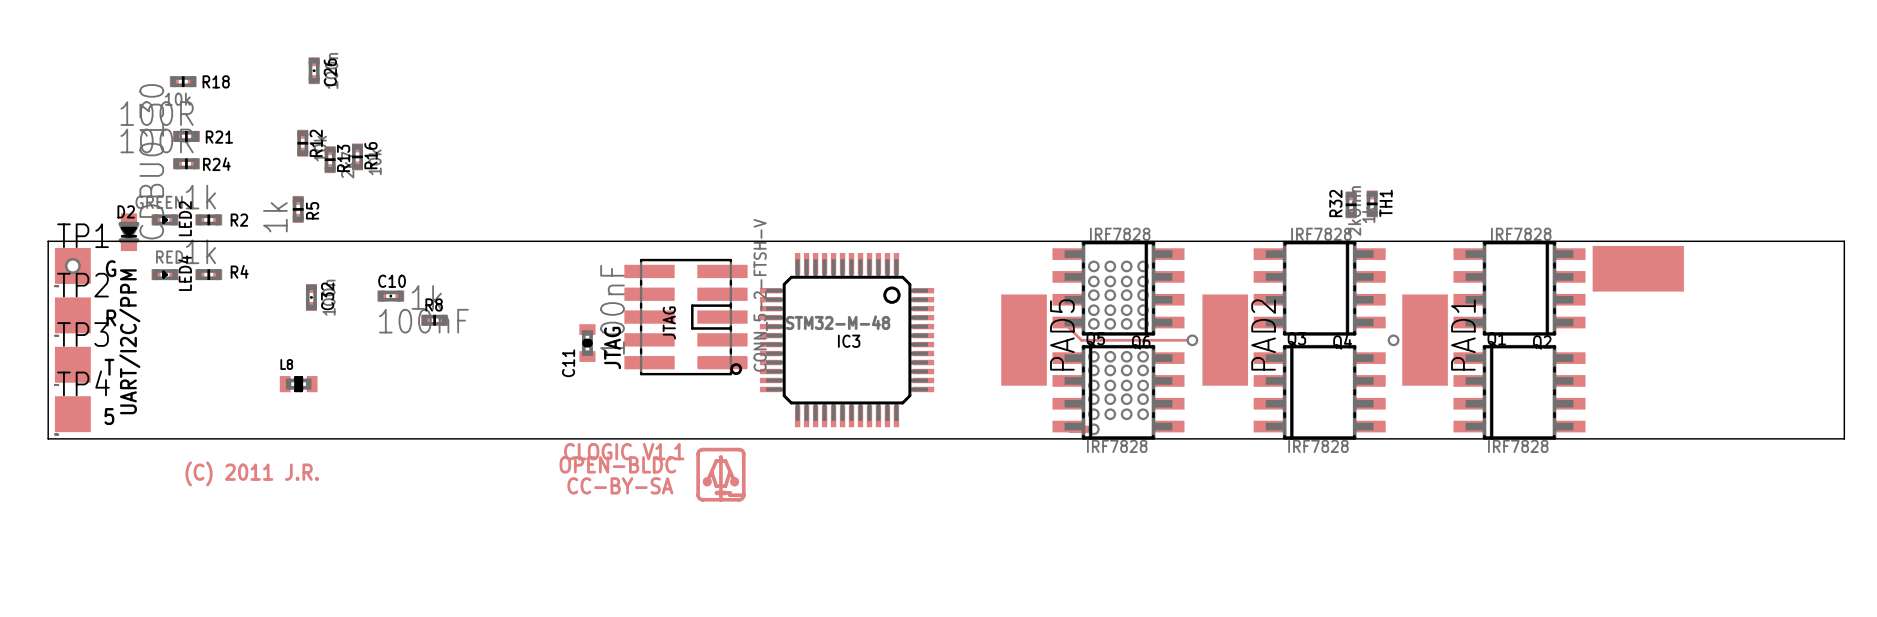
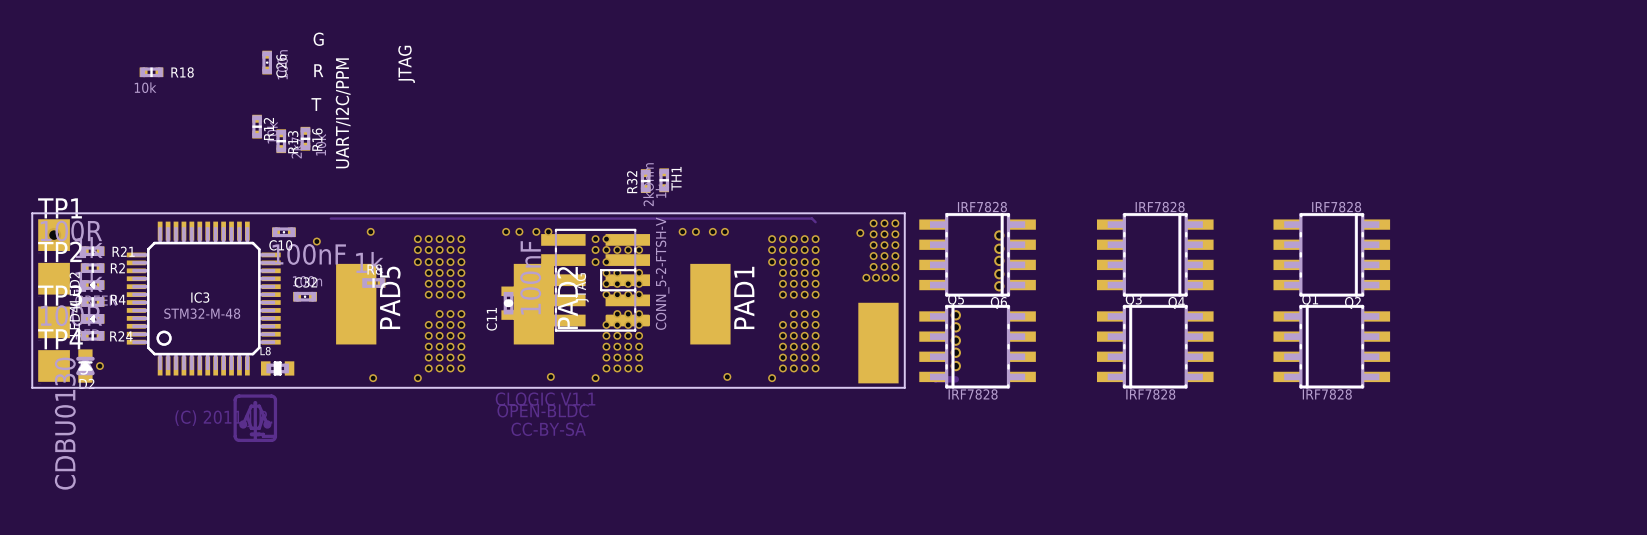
R21 position: (186, 136) -> (92, 251)
R24 position: (186, 163) -> (92, 335)
TH1 position: (1372, 203) -> (664, 180)
R32 position: (1351, 204) -> (645, 181)
R5: 1k (298, 209) -> none
LED2 rotation: 0° (164, 219) -> 180° (92, 285)
LED2 position: (164, 219) -> (92, 285)
R2 position: (208, 219) -> (92, 268)
D2 rotation: 0° (128, 232) -> 180° (85, 366)
D2 position: (128, 232) -> (85, 366)
board edge: (1036, 241) (1844, 241) (1844, 438) (1036, 438) -> (904, 213) (904, 387)
track: none -> (330, 218) (811, 218) (815, 222)
via: none -> (873, 223)
via: none -> (884, 223)
via: none -> (895, 223)
via: none -> (370, 231)
via: none -> (506, 231)
via: none -> (519, 231)
via: none -> (536, 231)
via: none -> (548, 231)
via: none -> (682, 231)
via: none -> (695, 231)
via: none -> (712, 231)
via: none -> (724, 231)
via: none -> (860, 233)
via: none -> (873, 234)
via: none -> (884, 234)
via: none -> (895, 234)
via: (1093, 266) -> none
via: (1110, 266) -> none
via: (1126, 266) -> none
text position: G (111, 268) -> G (318, 39)
part: (1638, 268) -> none
via: none -> (417, 239)
via: none -> (428, 239)
via: none -> (439, 239)
via: none -> (450, 239)
via: none -> (461, 239)
via: none -> (595, 239)
via: none -> (606, 239)
via: none -> (772, 239)
via: none -> (782, 239)
via: none -> (793, 239)
via: none -> (804, 239)
via: none -> (815, 239)
via: none -> (316, 241)
LED4 rotation: 0° (164, 274) -> 180° (92, 318)
LED4 position: (164, 274) -> (92, 318)
R4 position: (208, 274) -> (92, 301)
via: none -> (873, 245)
via: none -> (884, 245)
via: none -> (895, 245)
C10 name position: C10 (392, 281) -> C10 (280, 245)
via: (1093, 281) -> none
via: (1110, 281) -> none
via: (1126, 281) -> none
via: none -> (417, 249)
via: none -> (428, 249)
via: none -> (439, 249)
via: none -> (450, 249)
via: none -> (461, 249)
via: none -> (595, 249)
via: none -> (606, 249)
via: none -> (617, 249)
via: none -> (628, 249)
via: none -> (639, 249)
via: none -> (772, 249)
via: none -> (782, 249)
via: none -> (793, 249)
via: none -> (804, 249)
via: none -> (815, 249)
via: none -> (873, 256)
via: none -> (884, 256)
via: none -> (895, 256)
via: (1093, 295) -> none
via: (1110, 295) -> none
via: (1126, 295) -> none
C10 position: (390, 296) -> (283, 232)
via: none -> (417, 262)
via: none -> (428, 262)
via: none -> (439, 262)
via: none -> (450, 262)
via: none -> (461, 262)
via: none -> (595, 262)
via: none -> (606, 262)
via: none -> (772, 262)
via: none -> (782, 262)
via: none -> (793, 262)
via: none -> (804, 262)
via: none -> (815, 262)
C32 rotation: 0° (311, 297) -> 90° clockwise (305, 296)
C32 position: (311, 297) -> (305, 296)
via: none -> (873, 266)
via: none -> (884, 266)
via: none -> (895, 266)
via: none -> (428, 272)
via: none -> (439, 272)
via: none -> (450, 272)
via: none -> (461, 272)
via: none -> (606, 272)
via: none -> (617, 272)
via: none -> (639, 272)
via: none -> (782, 272)
via: none -> (793, 272)
via: none -> (804, 272)
via: none -> (815, 272)
via: (1093, 310) -> none
via: (1110, 310) -> none
via: (1126, 310) -> none
via: none -> (866, 277)
via: none -> (876, 277)
via: none -> (885, 277)
via: none -> (895, 277)
text position: R (111, 317) -> R (318, 70)
via: none -> (428, 283)
via: none -> (439, 283)
via: none -> (450, 283)
via: none -> (461, 283)
via: none -> (606, 283)
via: none -> (617, 283)
via: none -> (628, 283)
via: none -> (639, 283)
via: none -> (782, 283)
via: none -> (793, 283)
via: none -> (804, 283)
via: none -> (815, 283)
track: (1068, 322) (1068, 326) (1081, 340) (1192, 340) -> none
via: (1093, 323) -> none
via: (1110, 323) -> none
via: (1126, 323) -> none
via: none -> (428, 294)
via: none -> (439, 294)
via: none -> (450, 294)
via: none -> (461, 294)
via: none -> (606, 294)
via: none -> (617, 294)
via: none -> (628, 294)
via: none -> (639, 294)
via: none -> (782, 294)
via: none -> (793, 294)
via: none -> (804, 294)
via: none -> (815, 294)
IC3 rotation: 0° (847, 340) -> 180° (203, 298)
IC3 position: (847, 340) -> (203, 298)
PAD5 position: (1024, 340) -> (356, 304)
via: (1192, 340) -> none
PAD2 position: (1225, 340) -> (533, 304)
via: (1393, 340) -> none
PAD1 position: (1425, 340) -> (710, 304)
text position: UART/I2C/PPM (129, 341) -> UART/I2C/PPM (343, 113)
text position: JTAG (612, 347) -> JTAG (406, 64)
via: none -> (439, 314)
via: none -> (450, 314)
via: none -> (461, 314)
via: none -> (617, 314)
via: none -> (628, 314)
via: none -> (639, 314)
via: none -> (793, 314)
via: none -> (804, 314)
via: none -> (815, 314)
via: (1110, 356) -> none
via: (1126, 356) -> none
via: (1143, 356) -> none
drawing: [730, 363, 743, 376] -> none
text position: T (109, 367) -> T (316, 104)
via: none -> (428, 324)
via: none -> (439, 324)
via: none -> (450, 324)
via: none -> (461, 324)
via: none -> (606, 324)
via: none -> (617, 324)
via: none -> (628, 324)
via: none -> (639, 324)
via: none -> (782, 324)
via: none -> (793, 324)
via: none -> (804, 324)
via: none -> (815, 324)
via: (1110, 370) -> none
via: (1126, 370) -> none
via: (1143, 370) -> none
via: none -> (428, 335)
via: none -> (439, 335)
via: none -> (450, 335)
via: none -> (461, 335)
via: none -> (606, 335)
via: none -> (617, 335)
via: none -> (628, 335)
via: none -> (639, 335)
via: none -> (782, 335)
via: none -> (793, 335)
via: none -> (804, 335)
via: none -> (815, 335)
L8 position: (298, 384) -> (277, 368)
via: (1110, 385) -> none
via: (1126, 385) -> none
via: (1143, 385) -> none
part: none -> (878, 343)
via: none -> (428, 346)
via: none -> (439, 346)
via: none -> (450, 346)
via: none -> (461, 346)
via: none -> (606, 346)
via: none -> (617, 346)
via: none -> (628, 346)
via: none -> (639, 346)
via: none -> (782, 346)
via: none -> (793, 346)
via: none -> (804, 346)
via: none -> (815, 346)
via: (1110, 399) -> none
via: (1126, 399) -> none
via: (1143, 399) -> none
via: none -> (428, 357)
via: none -> (439, 357)
via: none -> (450, 357)
via: none -> (461, 357)
via: none -> (606, 357)
via: none -> (617, 357)
via: none -> (628, 357)
via: none -> (639, 357)
via: none -> (782, 357)
via: none -> (793, 357)
via: none -> (804, 357)
via: none -> (815, 357)
via: none -> (99, 366)
via: (1110, 414) -> none
via: (1126, 414) -> none
via: (1143, 414) -> none
via: none -> (428, 368)
via: none -> (439, 368)
via: none -> (450, 368)
via: none -> (461, 368)
via: none -> (606, 368)
via: none -> (617, 368)
via: none -> (628, 368)
via: none -> (639, 368)
via: none -> (782, 368)
via: none -> (793, 368)
via: none -> (804, 368)
via: none -> (815, 368)
via: none -> (550, 376)
via: none -> (727, 376)
via: none -> (373, 378)
via: none -> (417, 378)
via: none -> (595, 378)
via: none -> (772, 378)
via: (1093, 429) -> none
drawing position: (720, 474) -> (255, 418)

